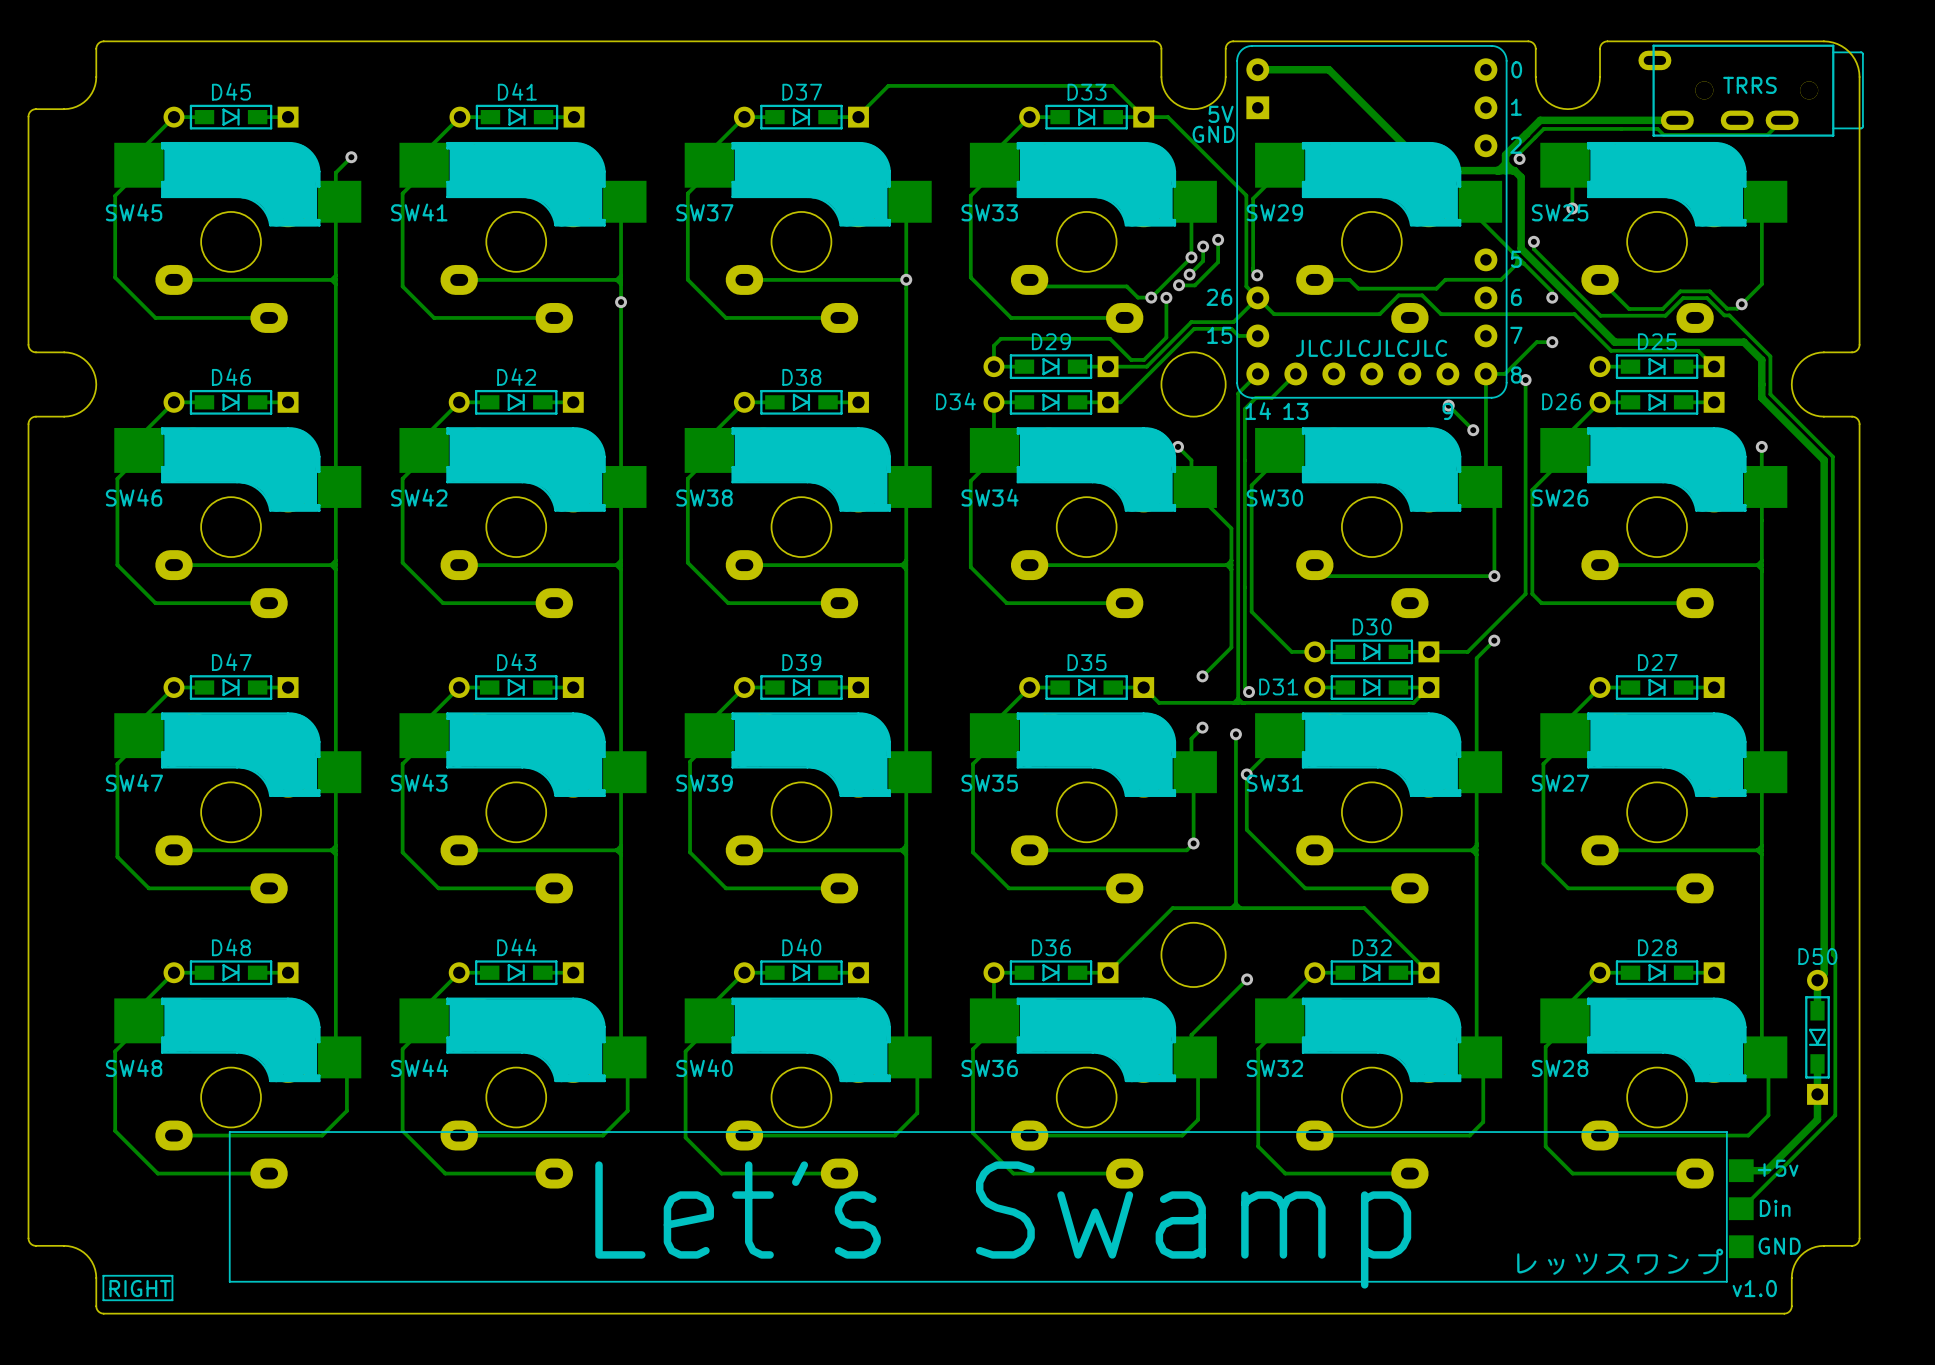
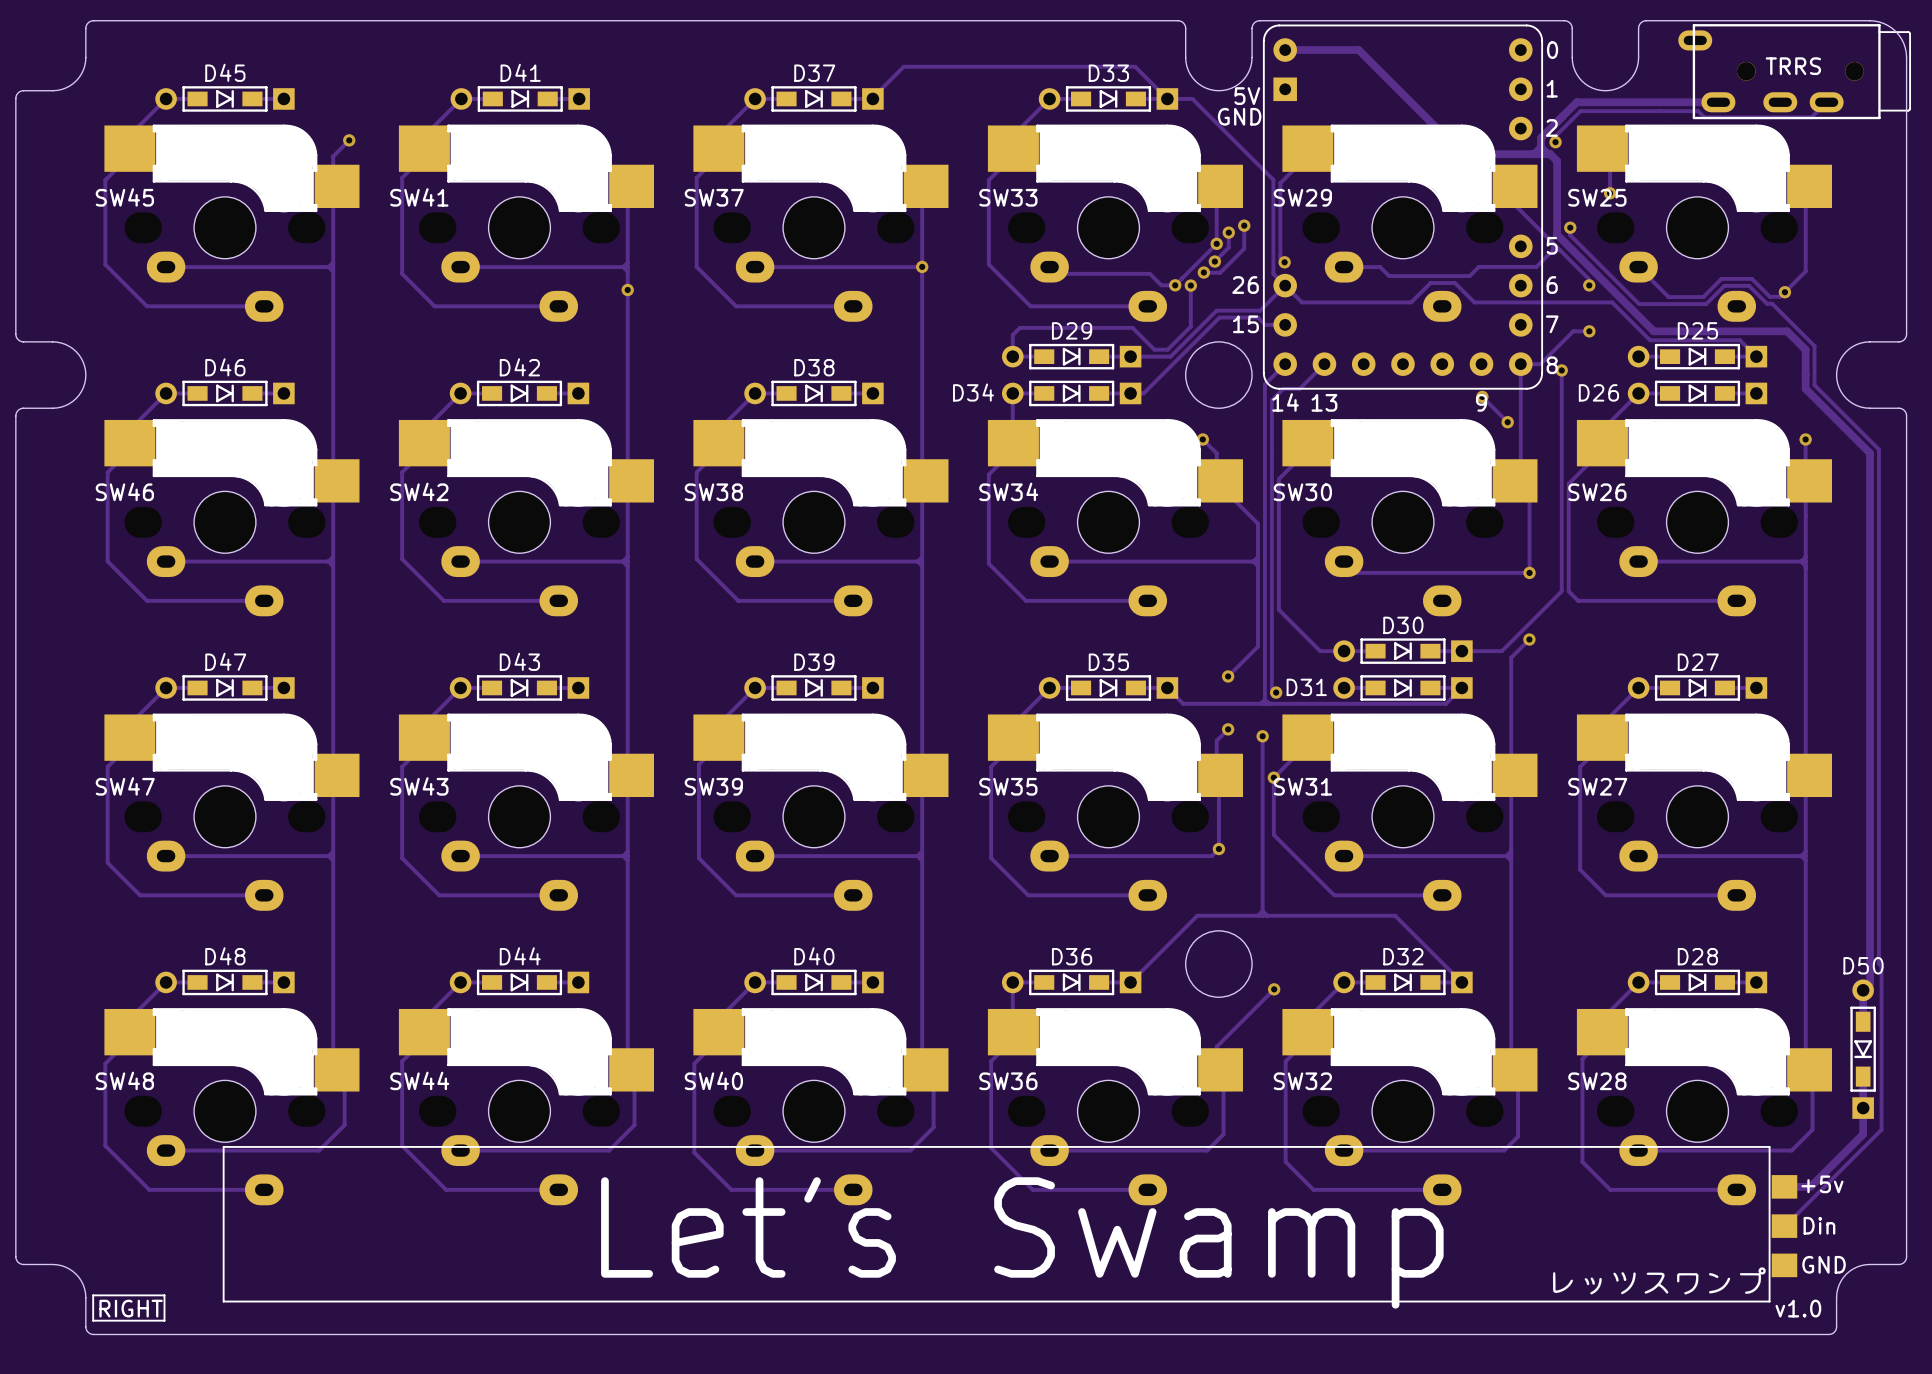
text: JLCJLCJLCJLC (1371, 348) -> none

